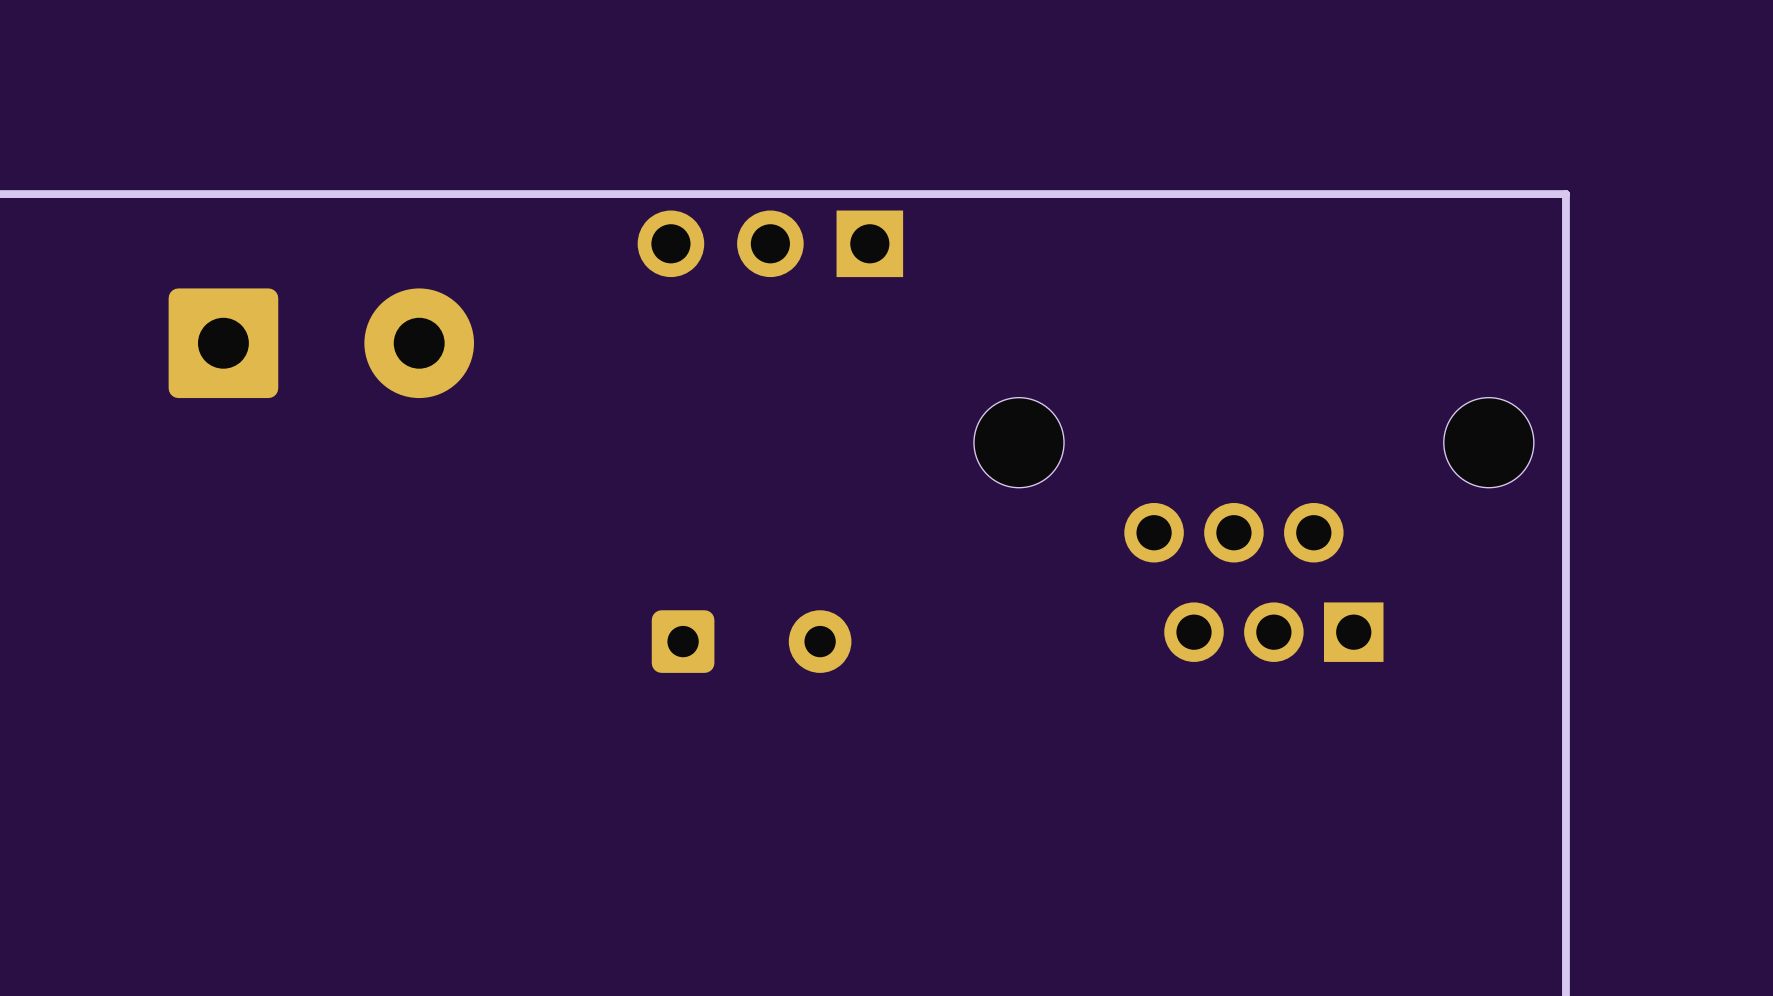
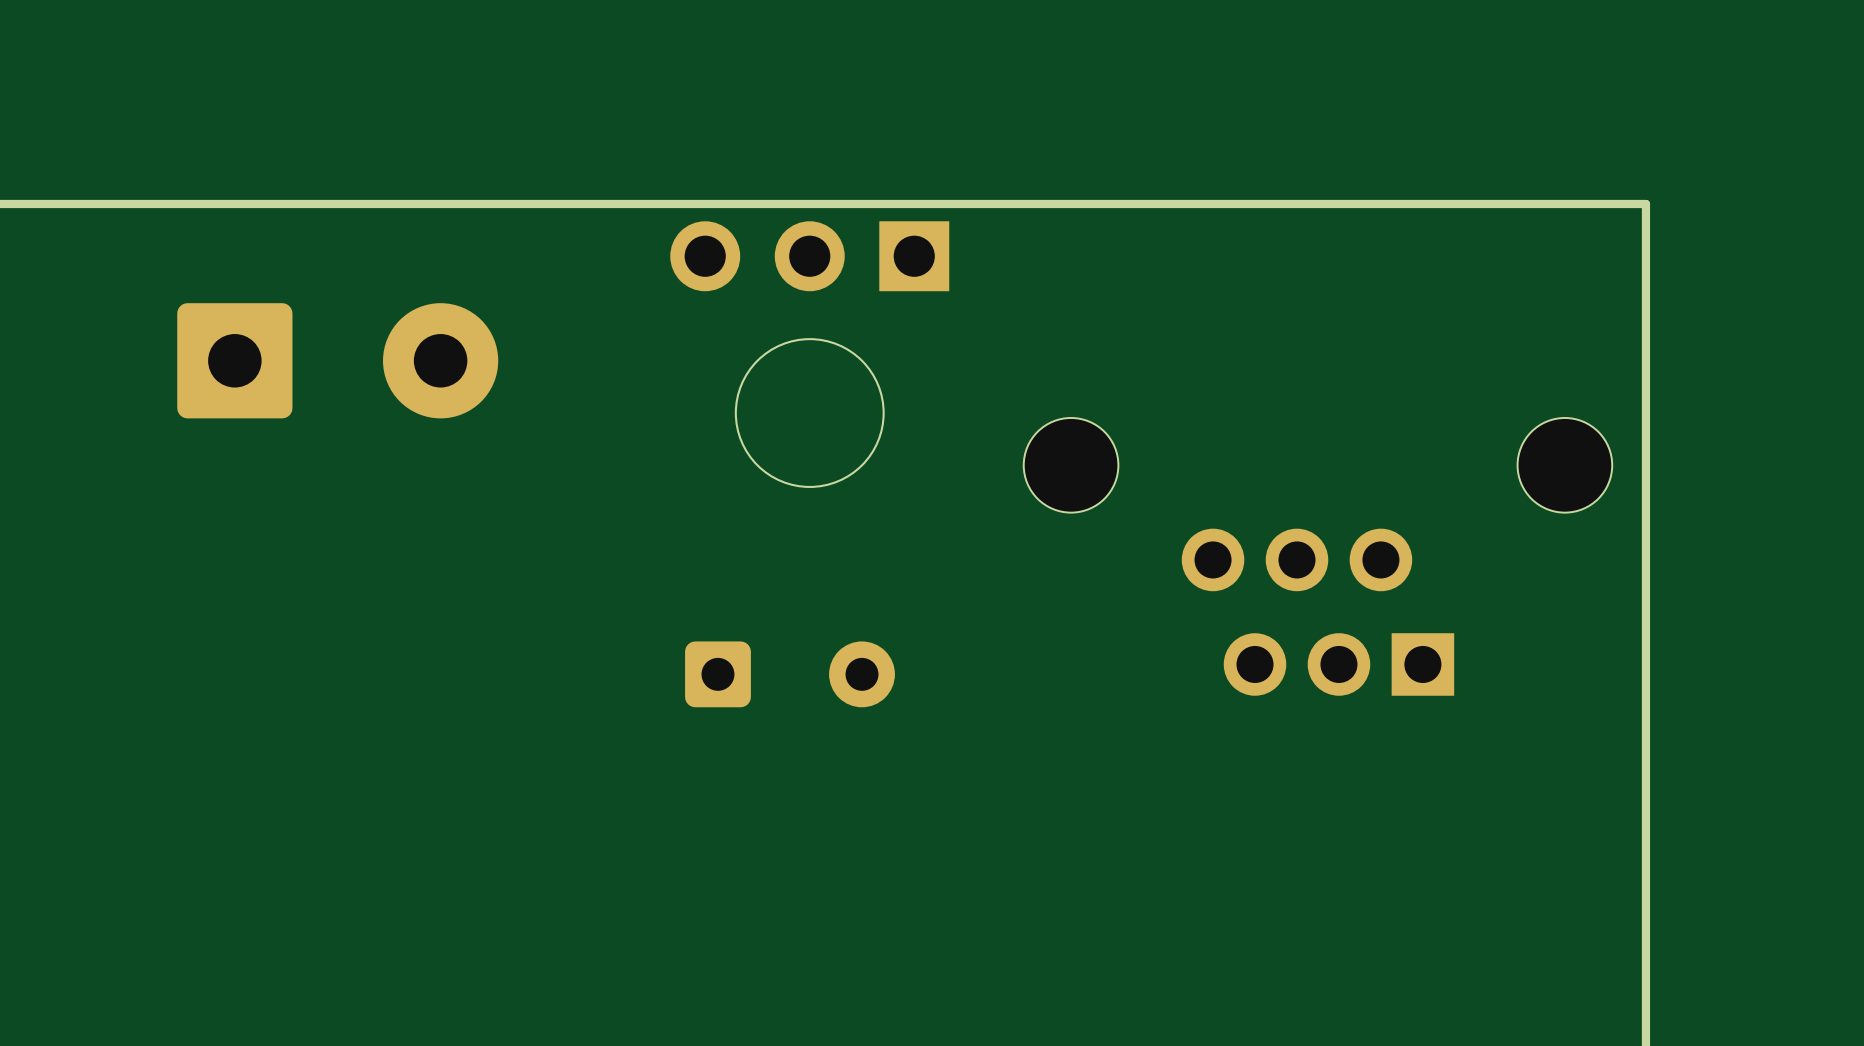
round board edge: none -> [734, 338, 885, 488]

